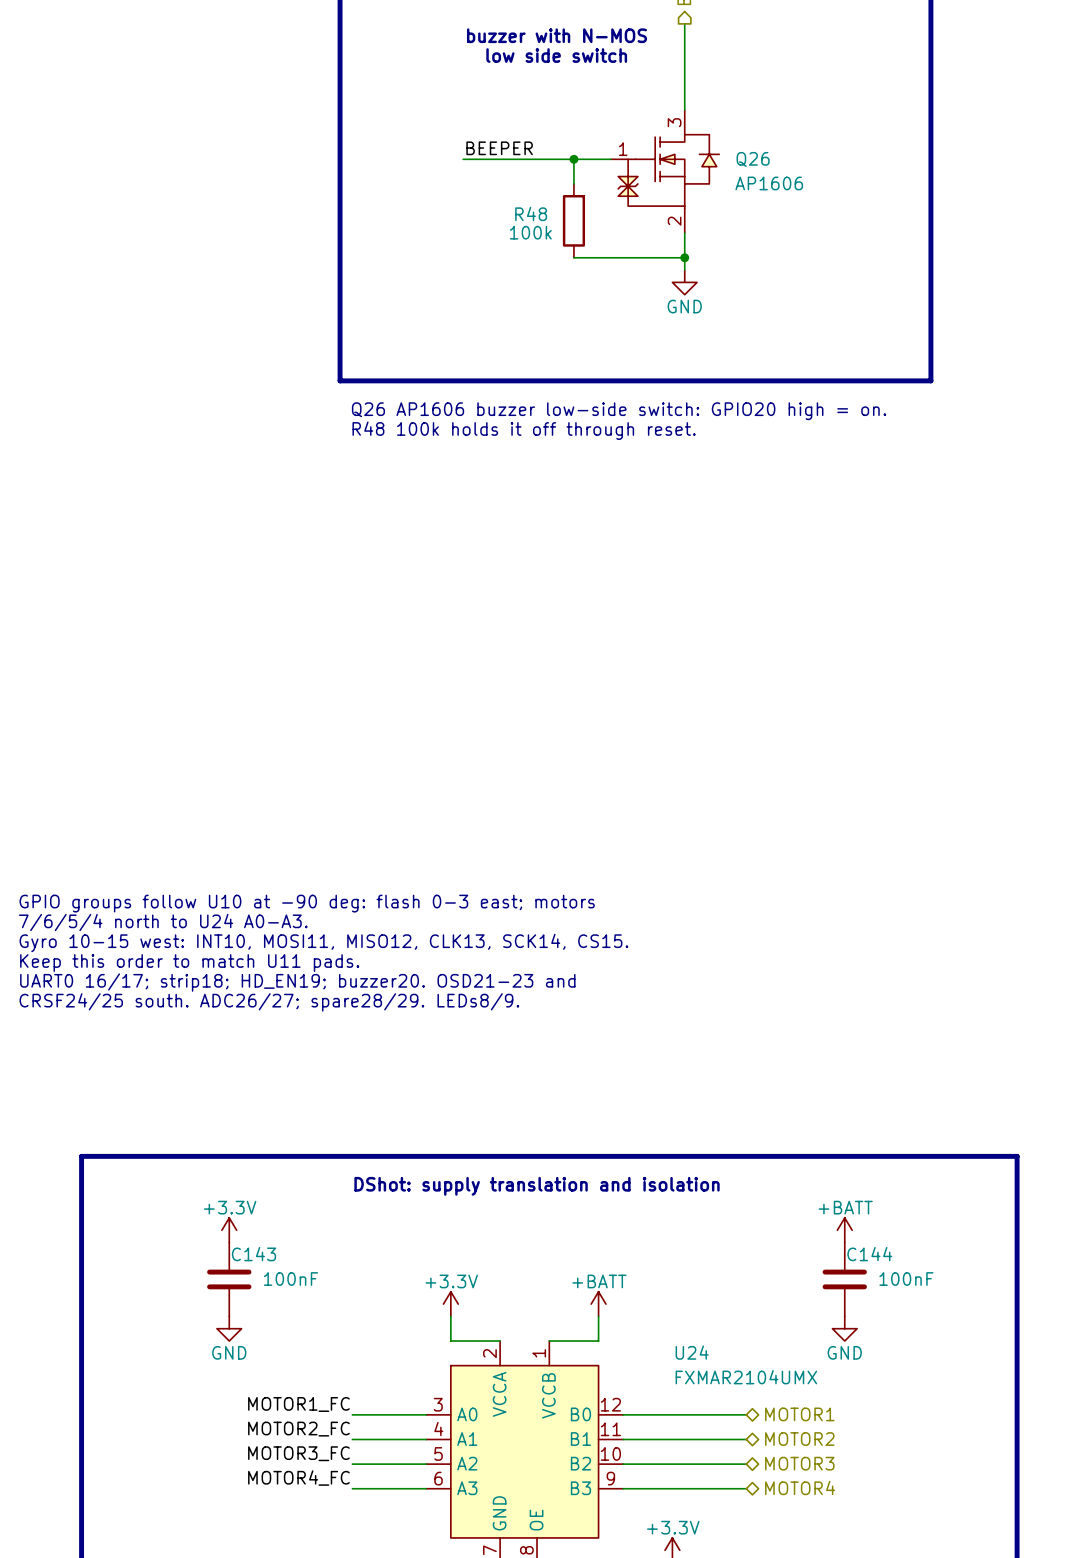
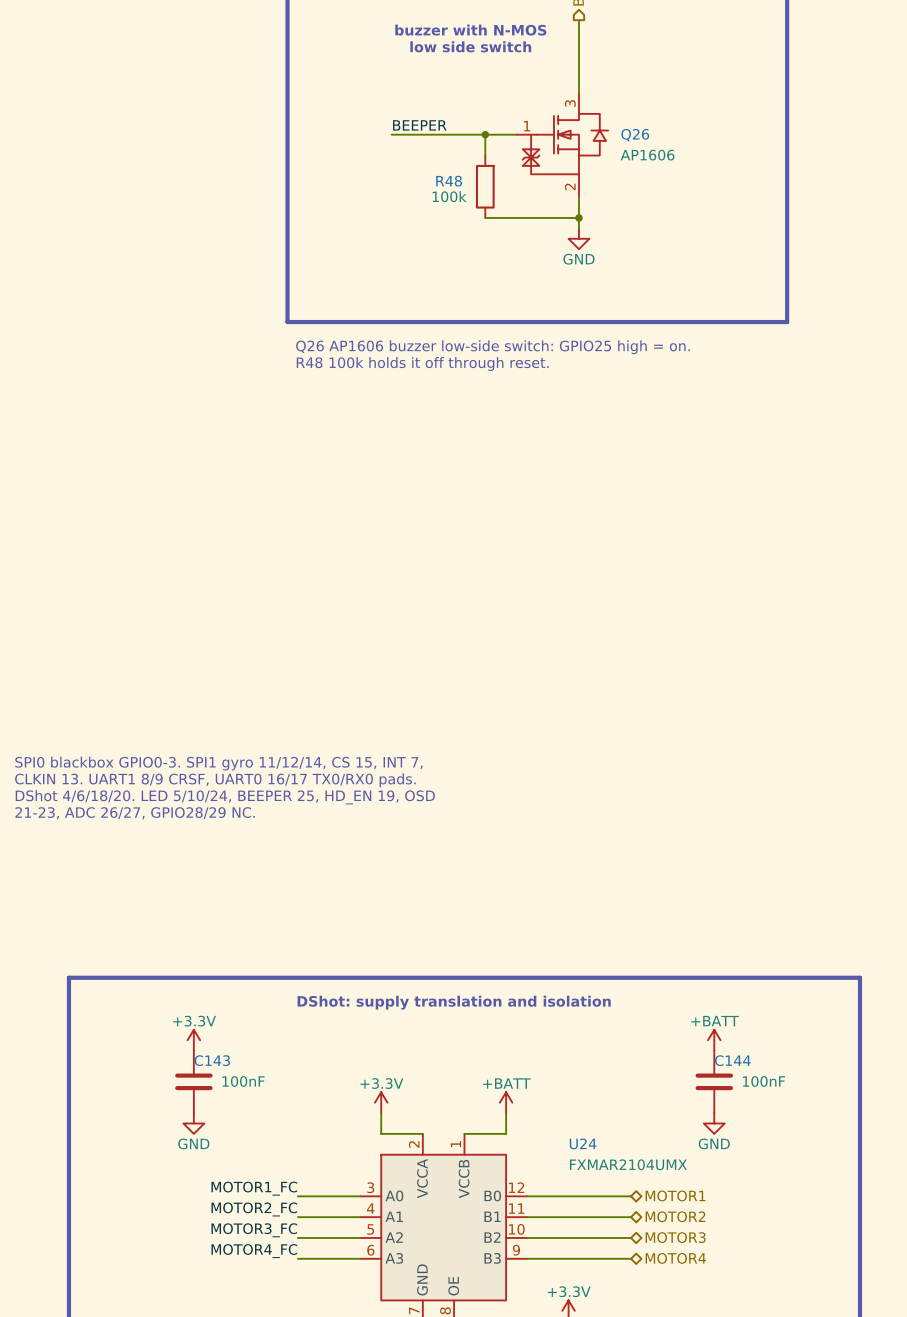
text: Q26 AP1606 buzzer low-side switch: GPIO20 high = on. (619, 411) -> Q26 AP1606 buzzer low-side switch: GPIO25 high = on. (492, 347)
text: GPIO groups follow U10 at -90 deg: flash 0-3 east; motors (307, 903) -> SPI0 blackbox GPIO0-3. SPI1 gyro 11/12/14, CS 15, INT 7, (218, 763)
text: 7/6/5/4 north to U24 A0-A3. (163, 922) -> CLKIN 13. UART1 8/9 CRSF, UART0 16/17 TX0/RX0 pads. (215, 780)
text: Gyro 10-15 west: INT10, MOSI11, MISO12, CLK13, SCK14, CS15. (323, 942) -> DShot 4/6/18/20. LED 5/10/24, BEEPER 25, HD_EN 19, OSD (225, 797)
text: Keep this order to match U11 pads. (189, 963) -> 21-23, ADC 26/27, GPIO28/29 NC. (135, 813)
text: UART0 16/17; strip18; HD_EN19; buzzer20. OSD21-23 and (297, 982) -> none
text: CRSF24/25 south. ADC26/27; spare28/29. LEDs8/9. (269, 1002) -> none

